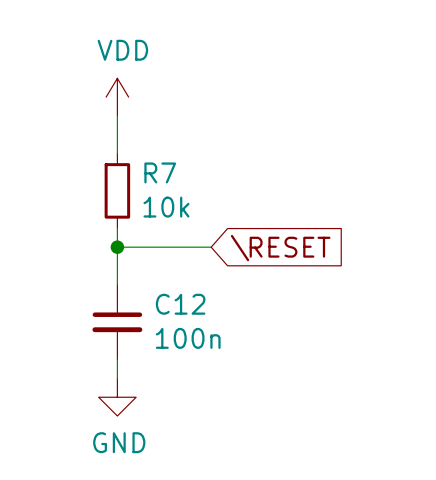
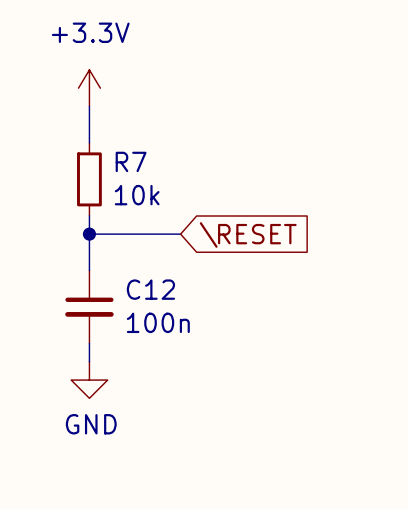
power symbol: VDD (117, 97) -> +3.3V (89, 88)

